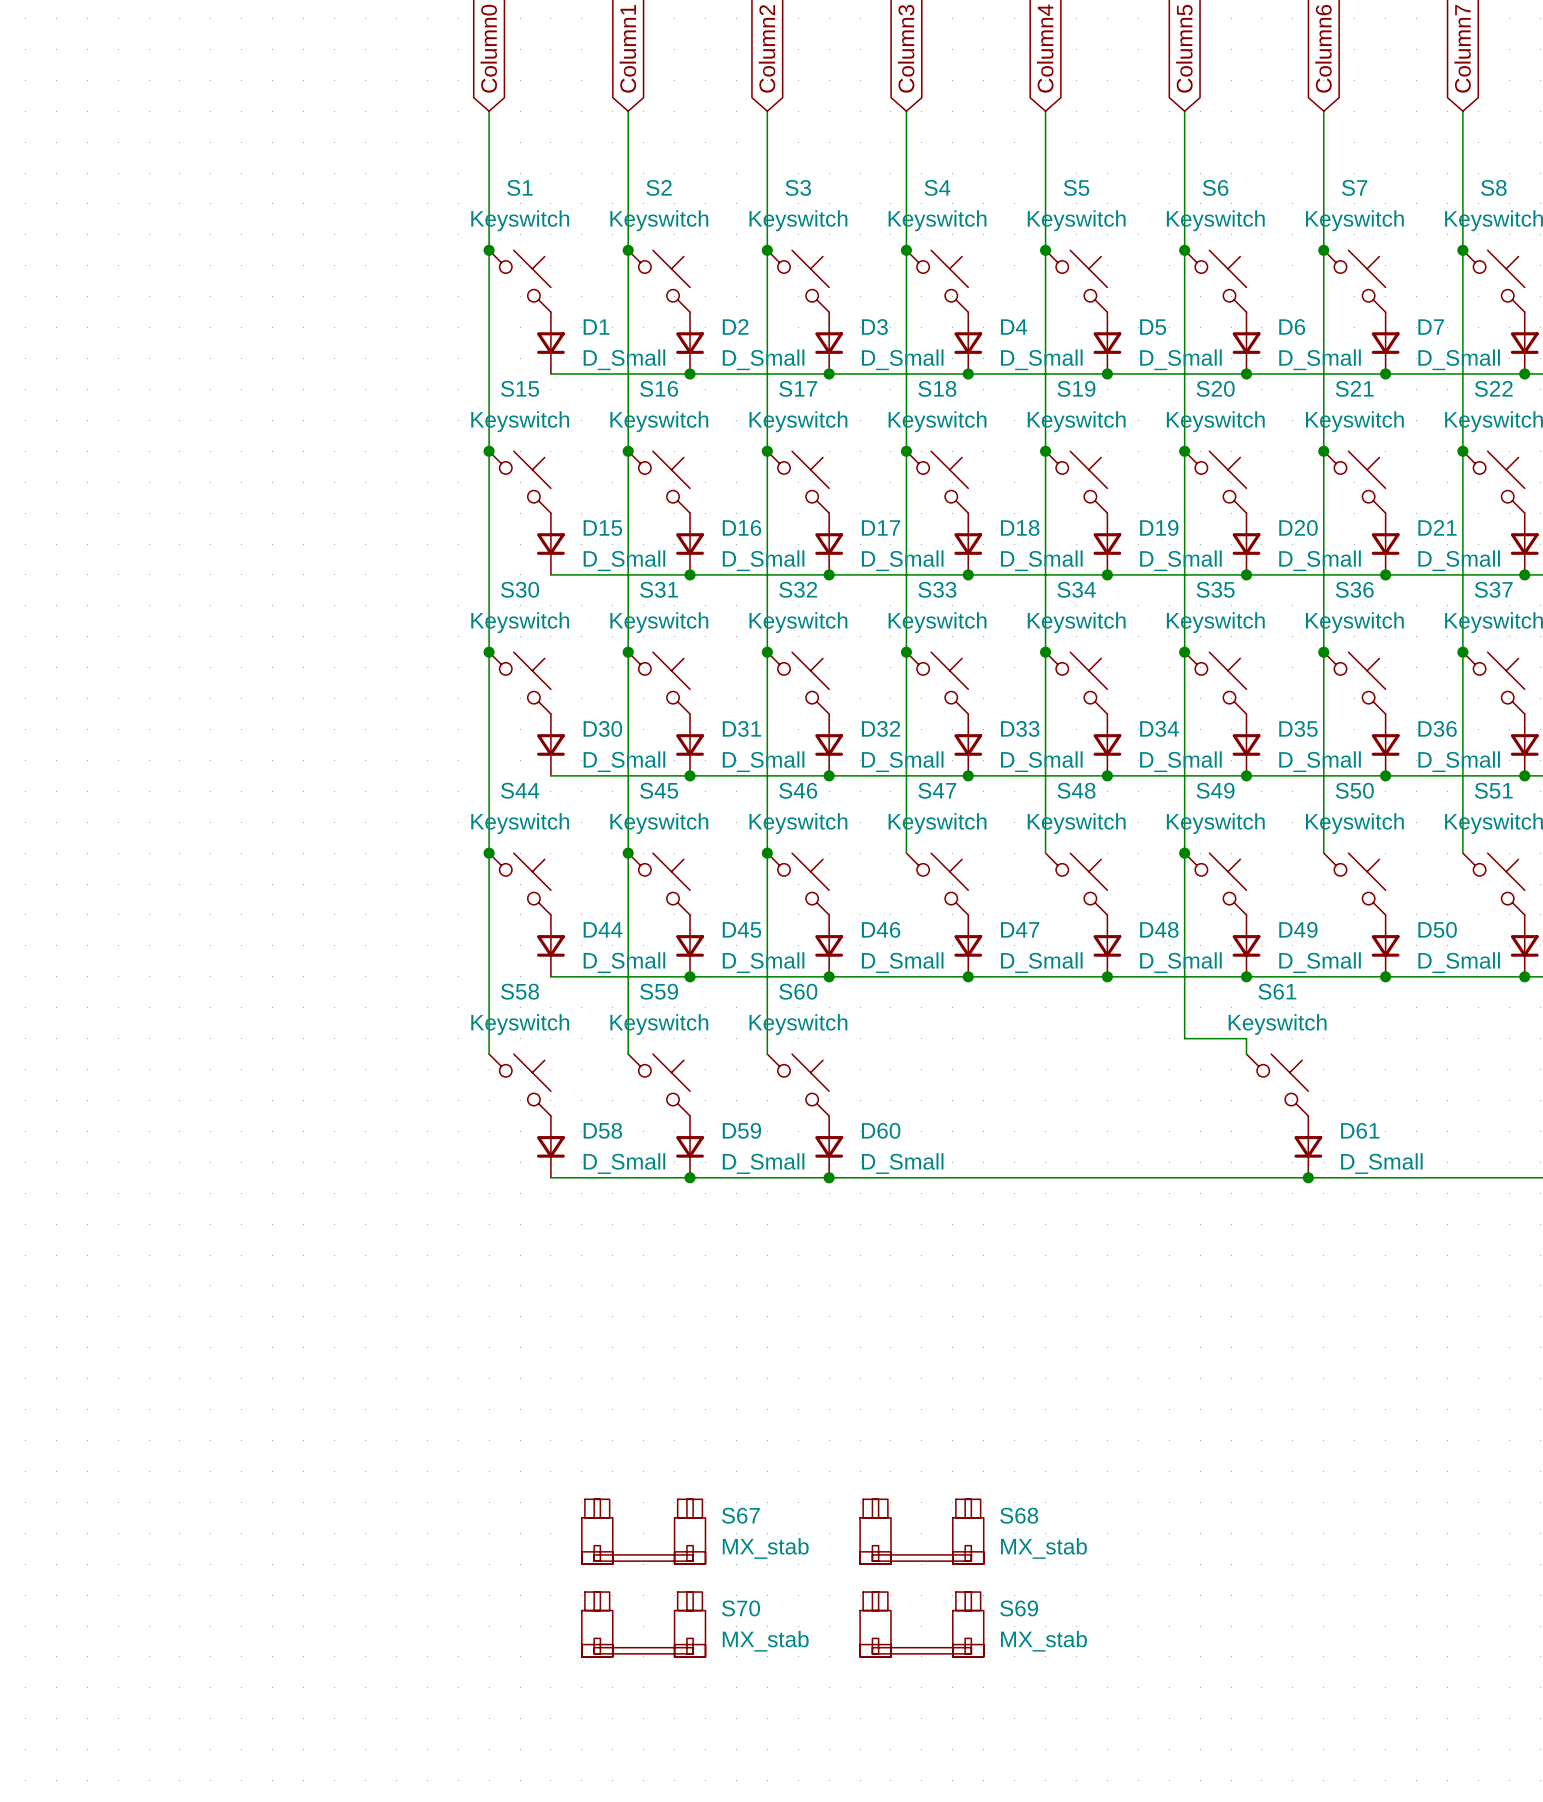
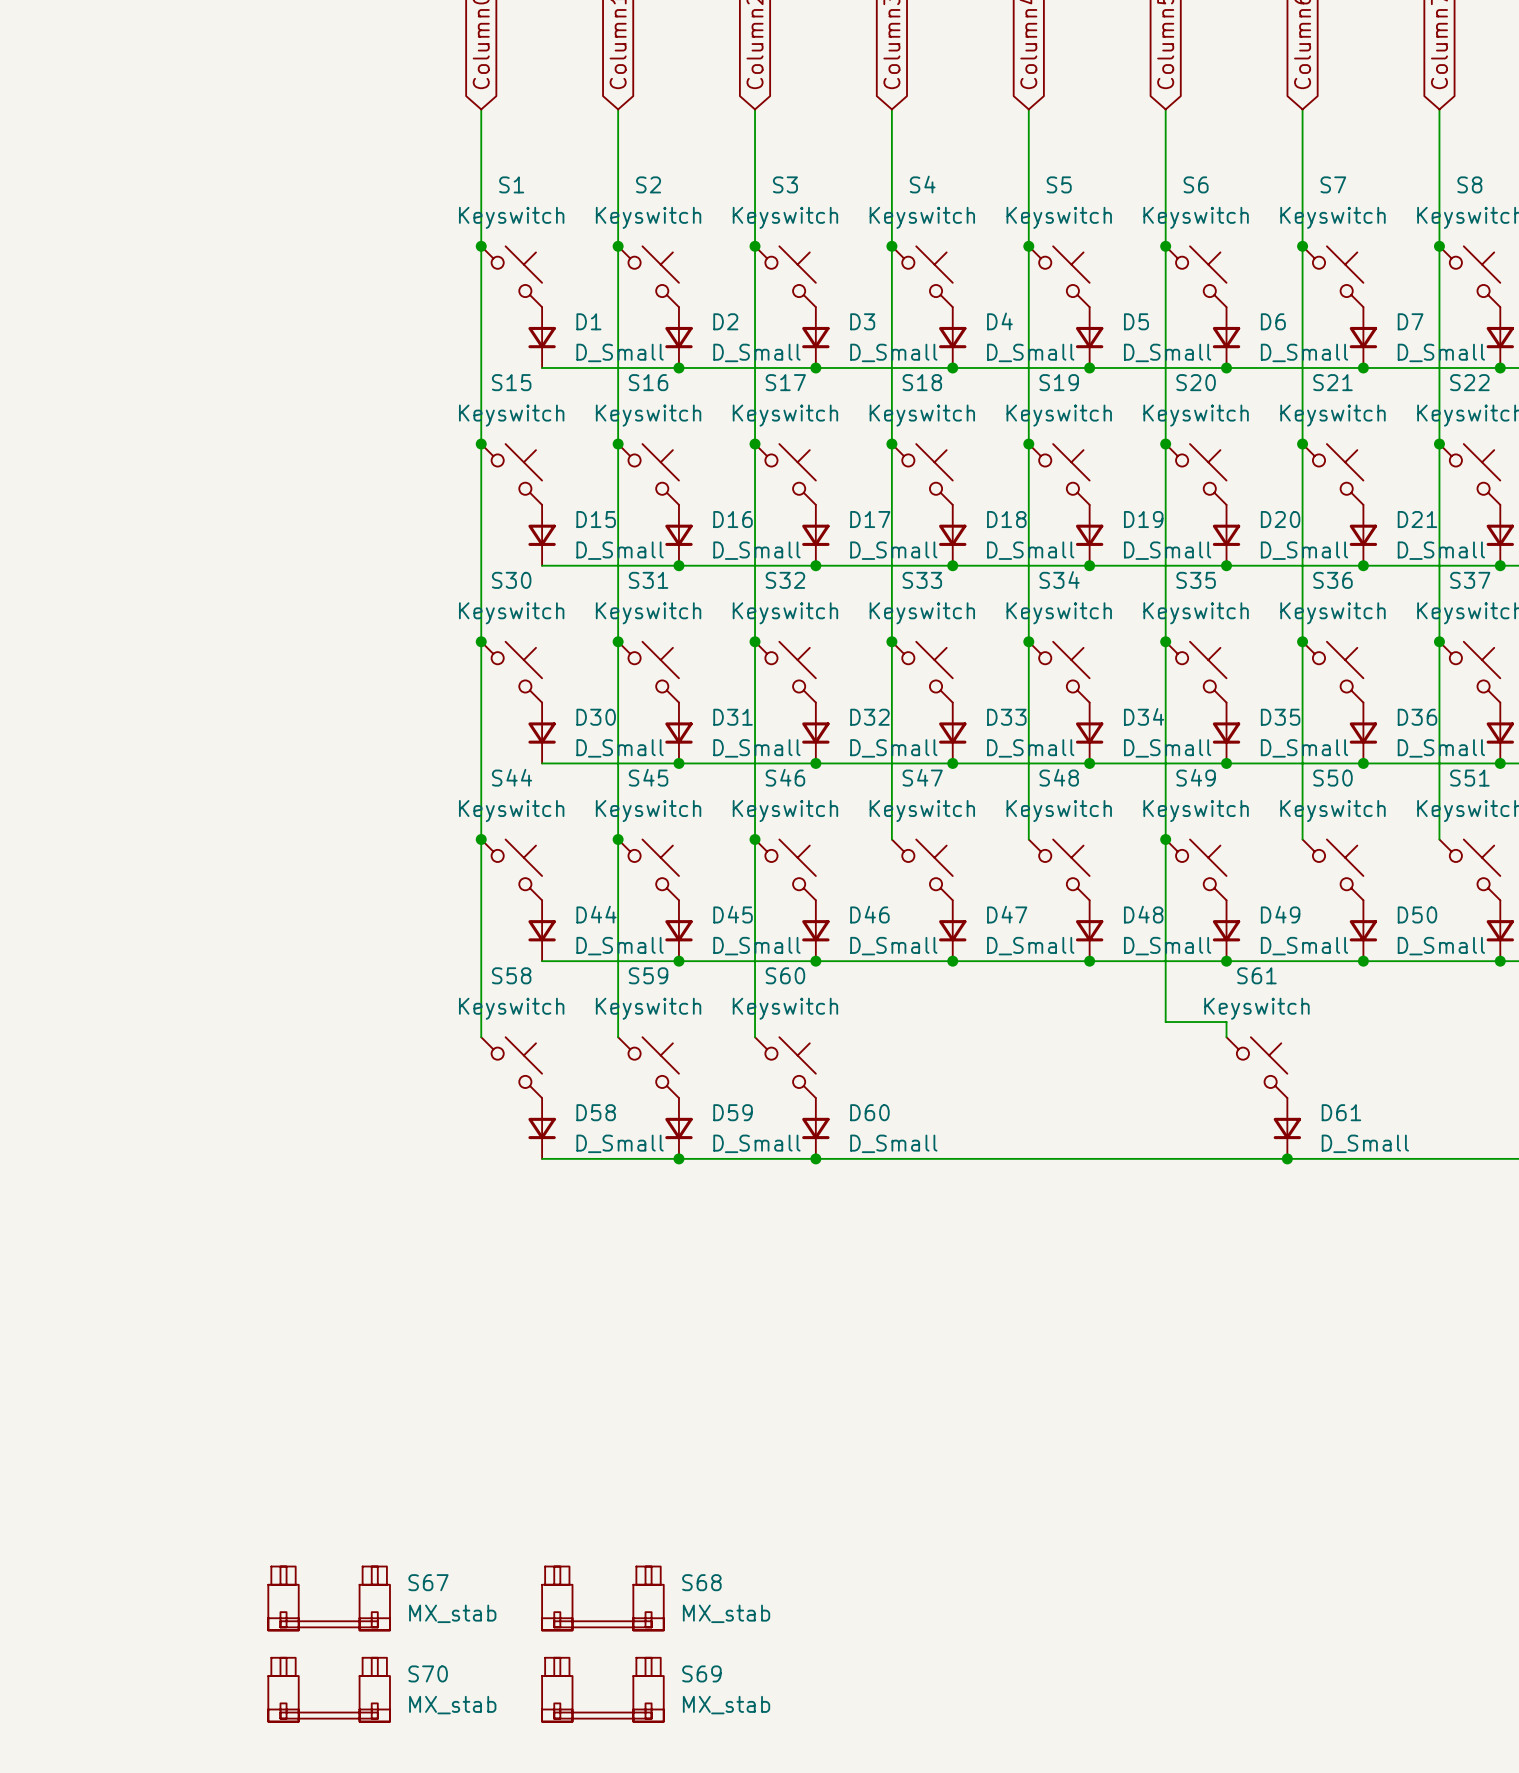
S67 position: (643, 1531) -> (329, 1598)
S68 position: (921, 1531) -> (602, 1598)
S70 position: (643, 1624) -> (329, 1689)
S69 position: (921, 1624) -> (602, 1689)

